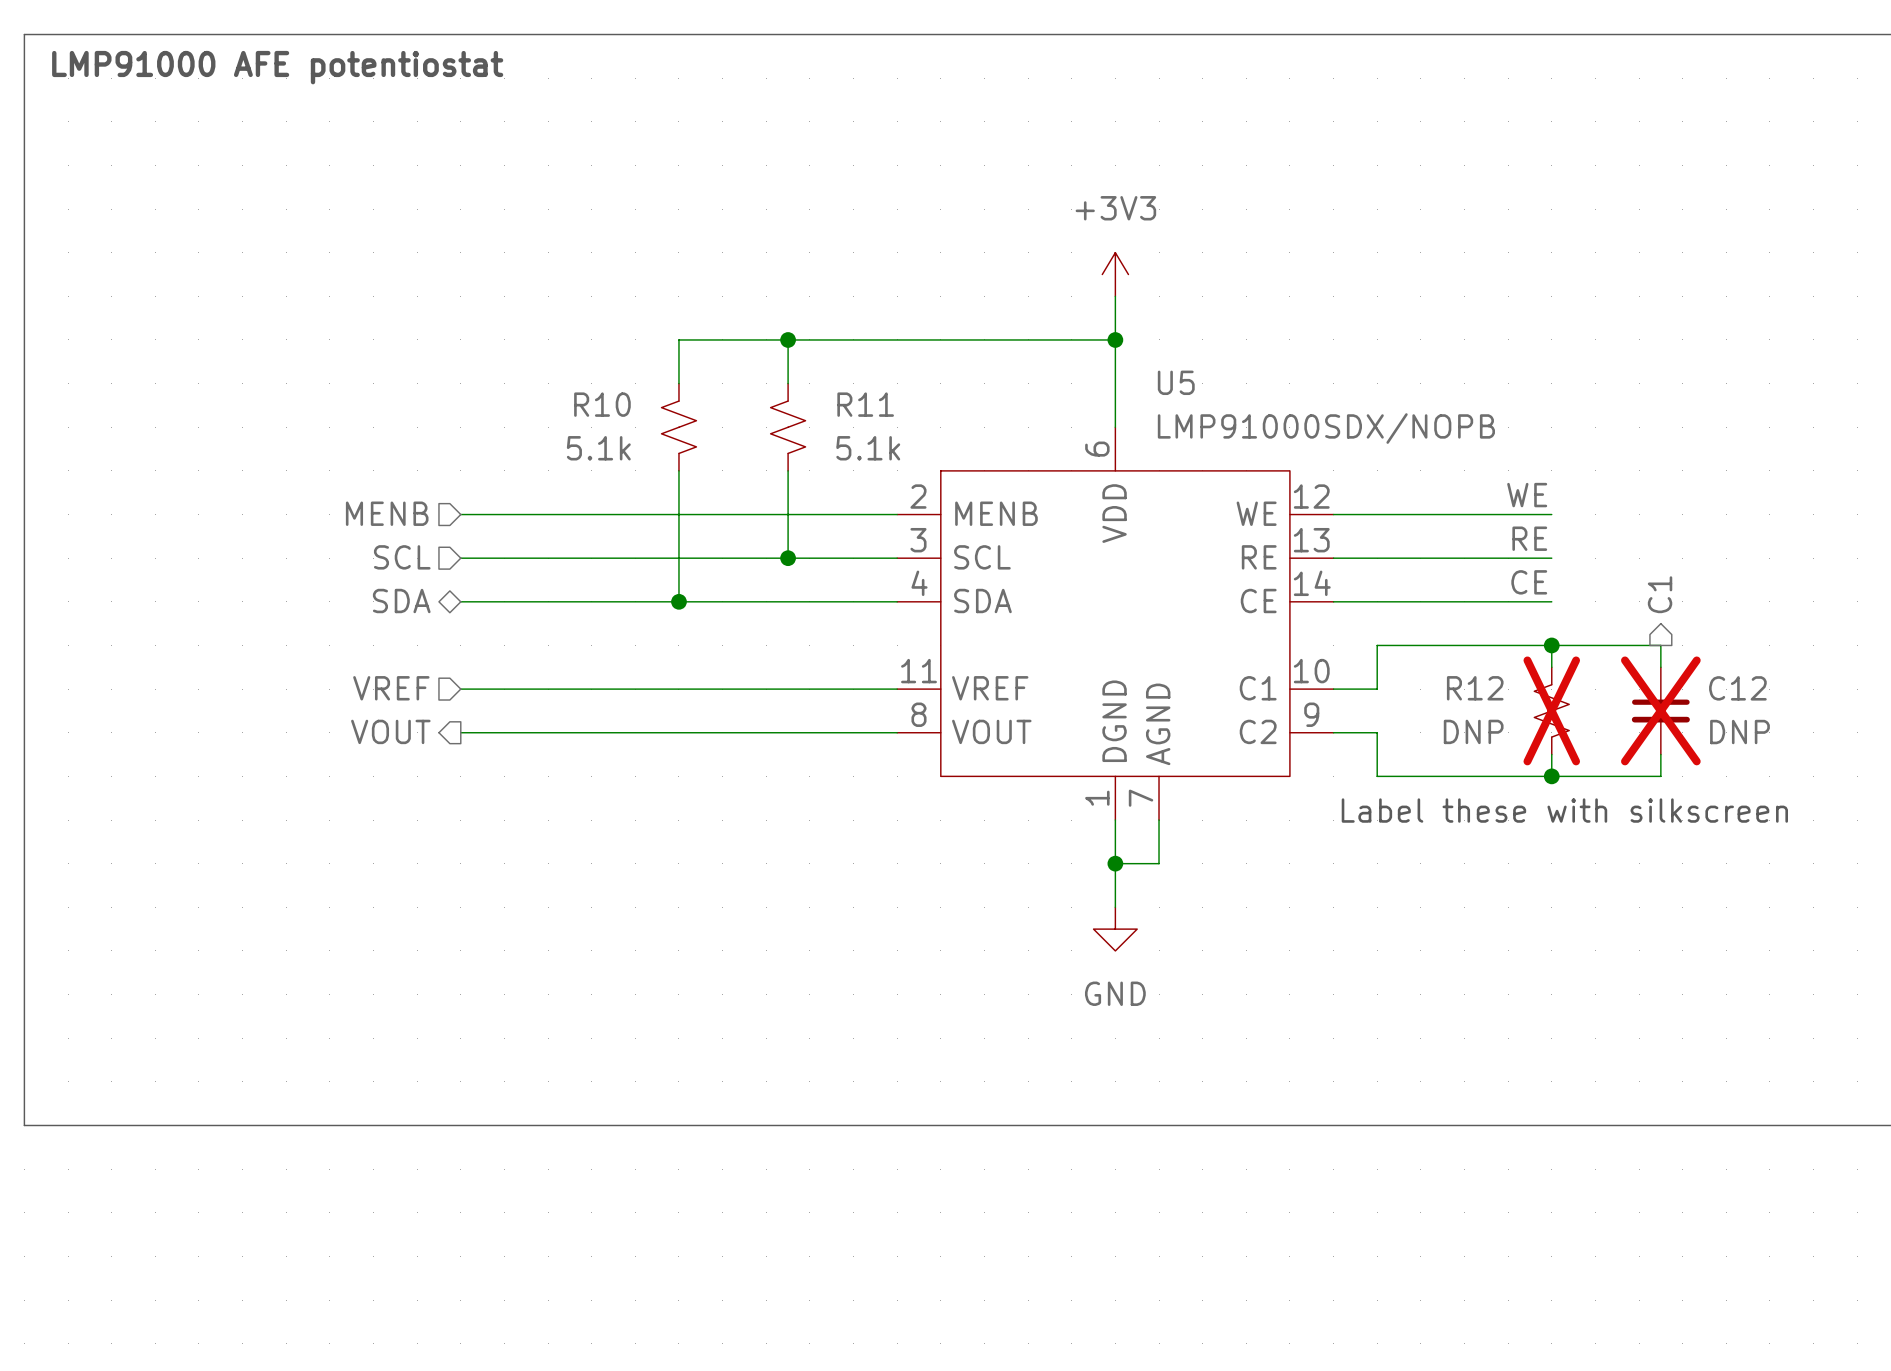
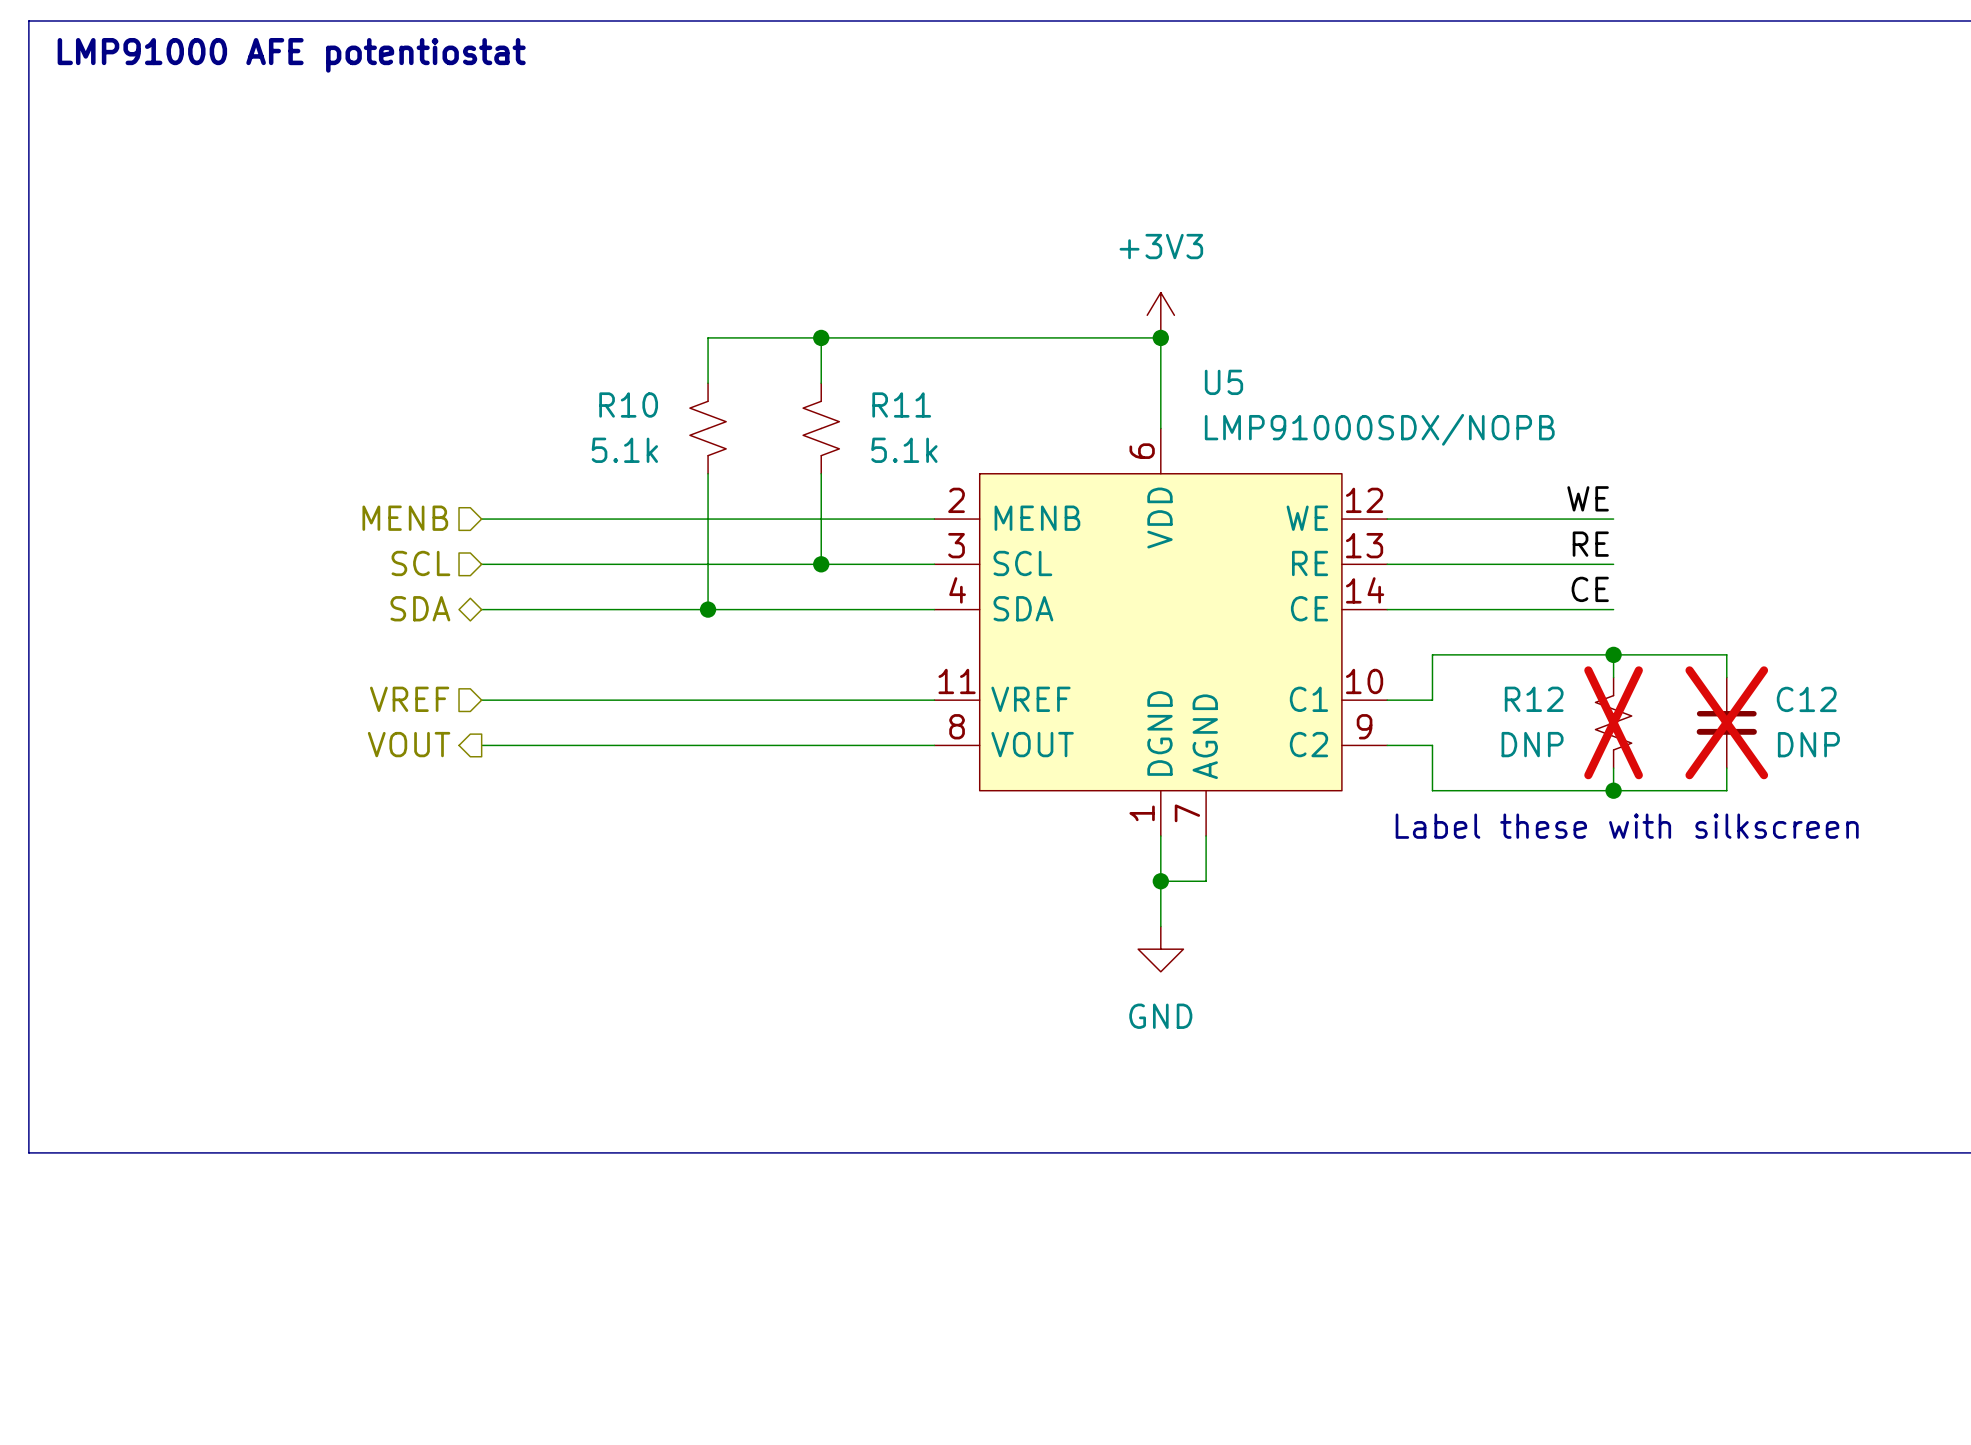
power symbol position: +3V3 (1115, 274) -> +3V3 (1160, 315)
hierarchical label: C1 (1660, 594) -> none

